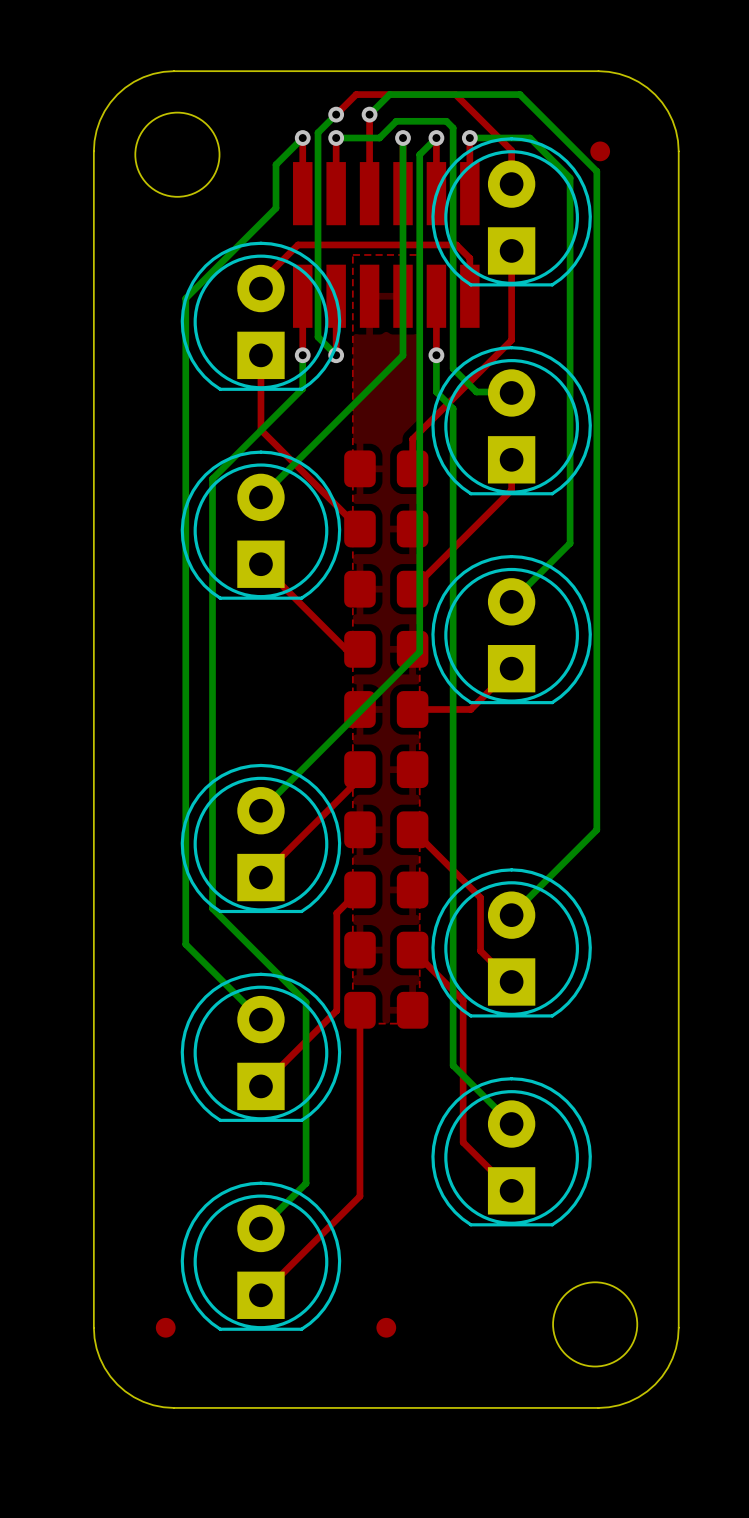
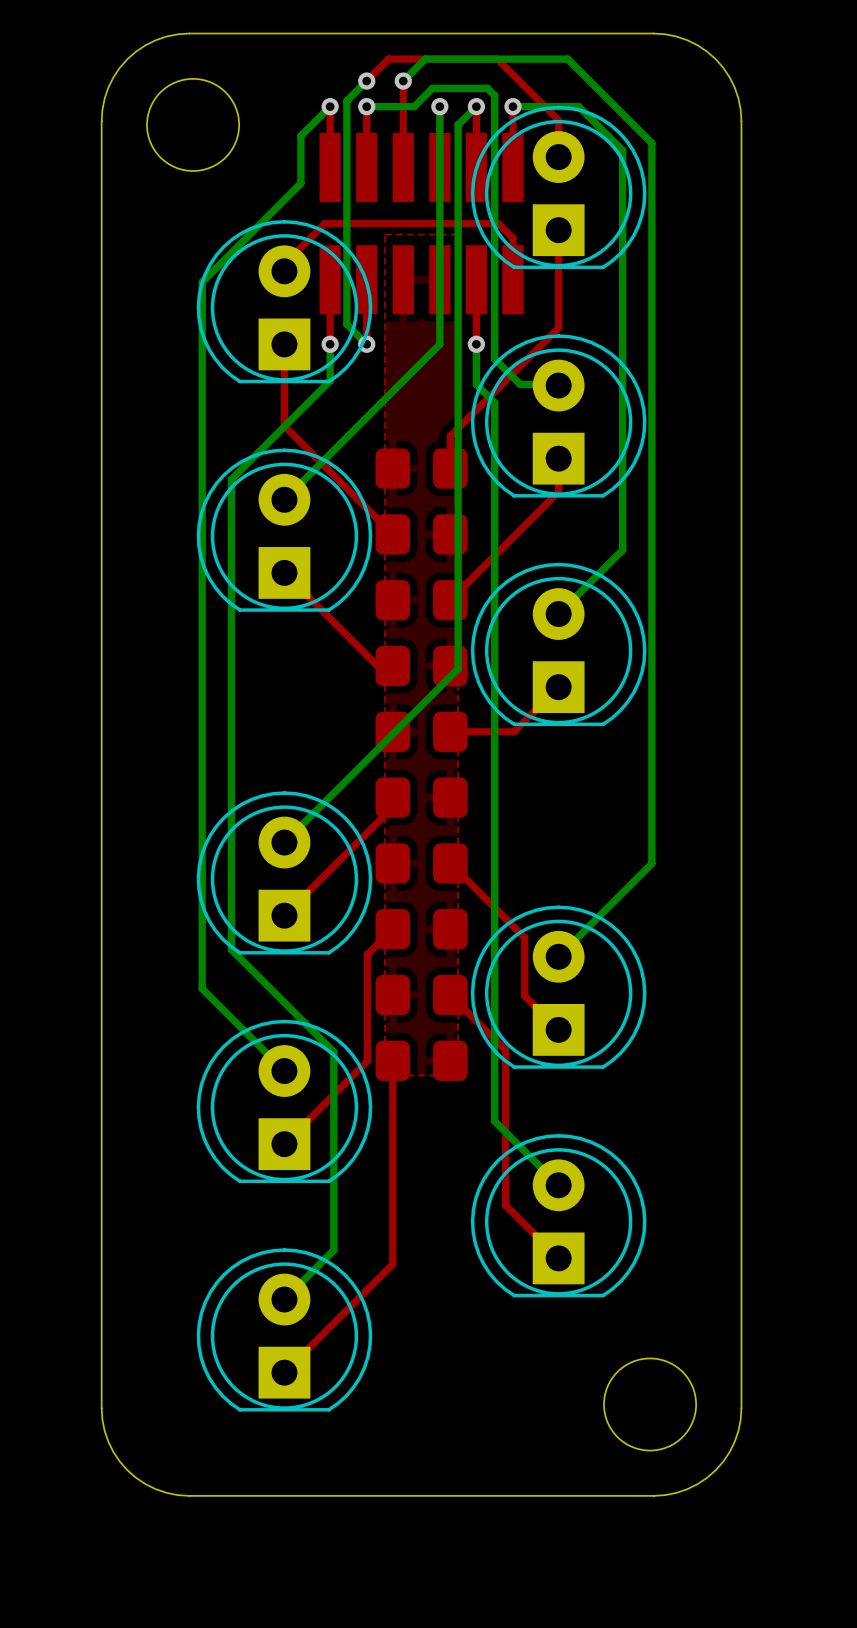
part: (600, 151) -> none
part: (165, 1327) -> none
part: (386, 1327) -> none

